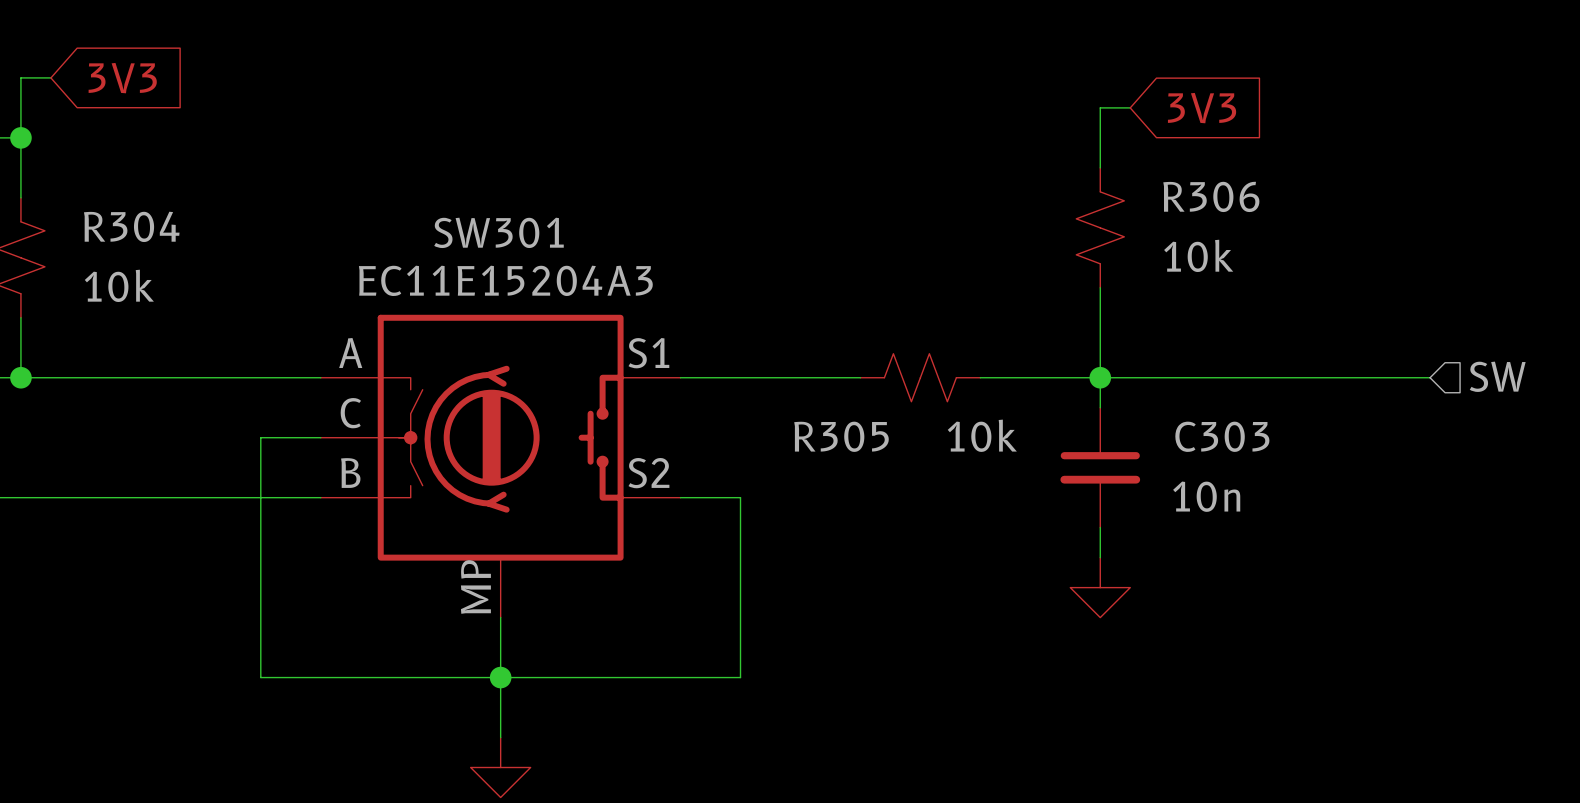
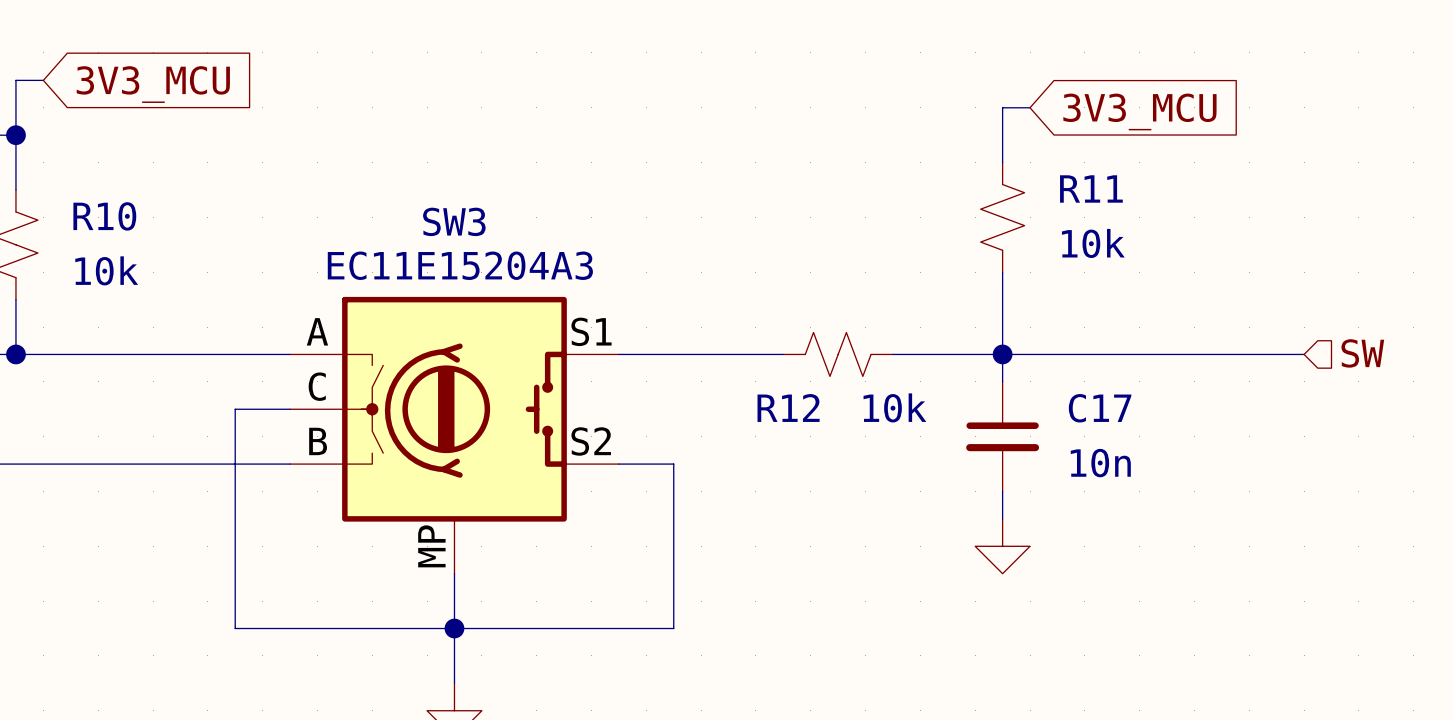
global label: 3V3 (122, 78) -> 3V3_MCU (153, 84)
global label: 3V3 (1202, 108) -> 3V3_MCU (1139, 111)
R306 name: R306 (1211, 196) -> R11 (1091, 188)
R304 name: R304 (131, 226) -> R10 (104, 216)
SW301 name: SW301 (498, 232) -> SW3 (454, 221)
R305 name: R305 (841, 436) -> R12 (788, 407)
C303 name: C303 (1222, 436) -> C17 (1100, 408)

